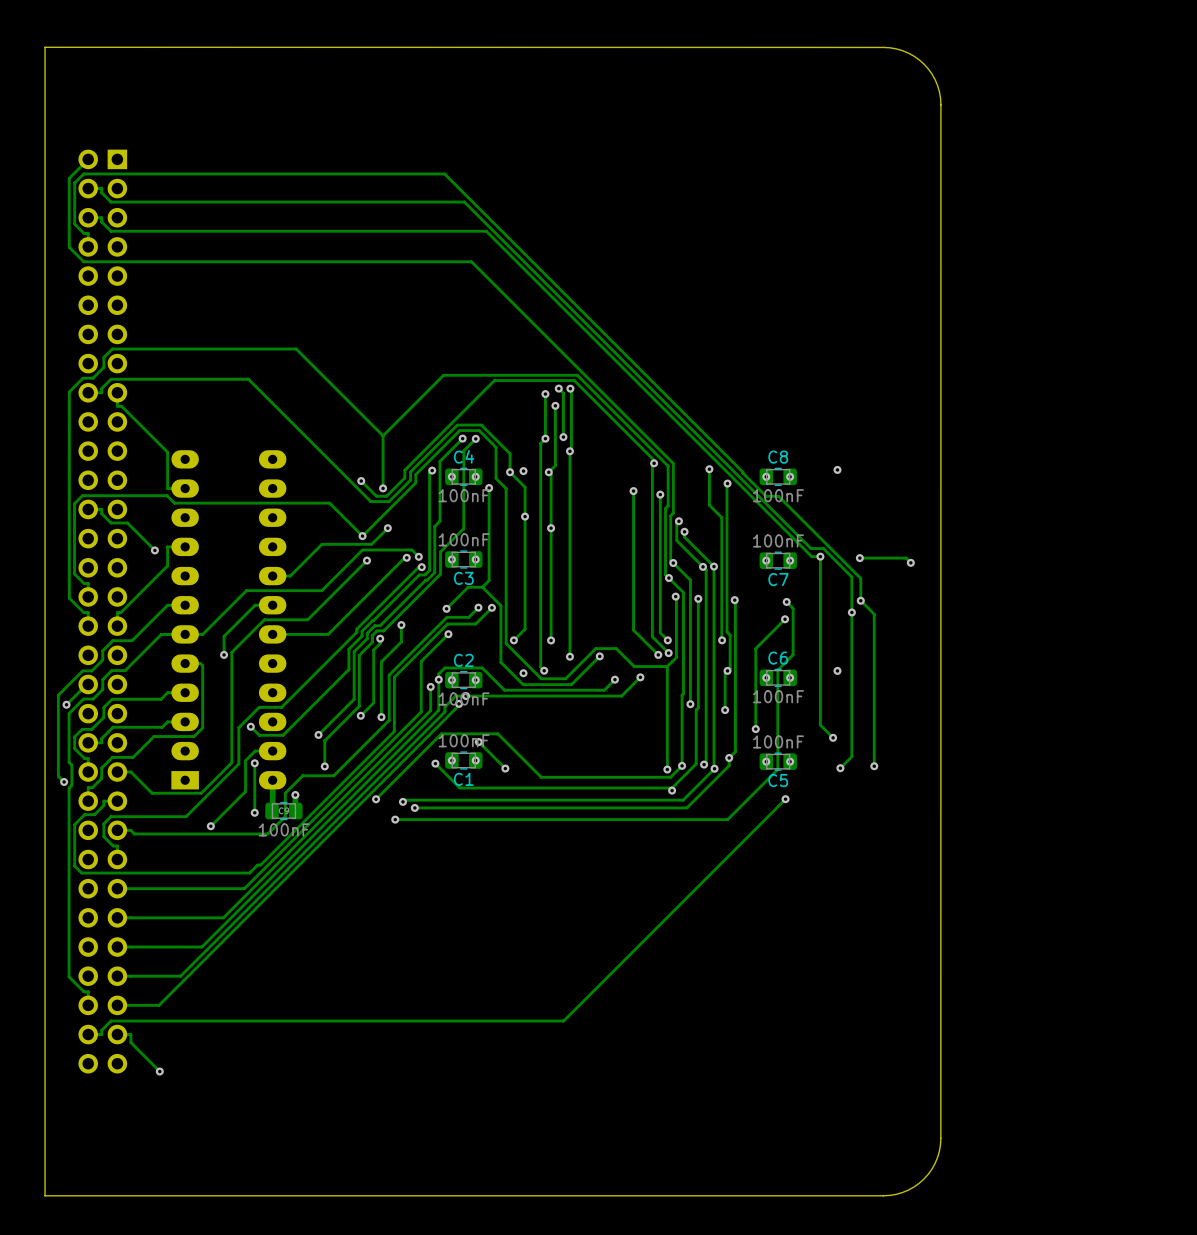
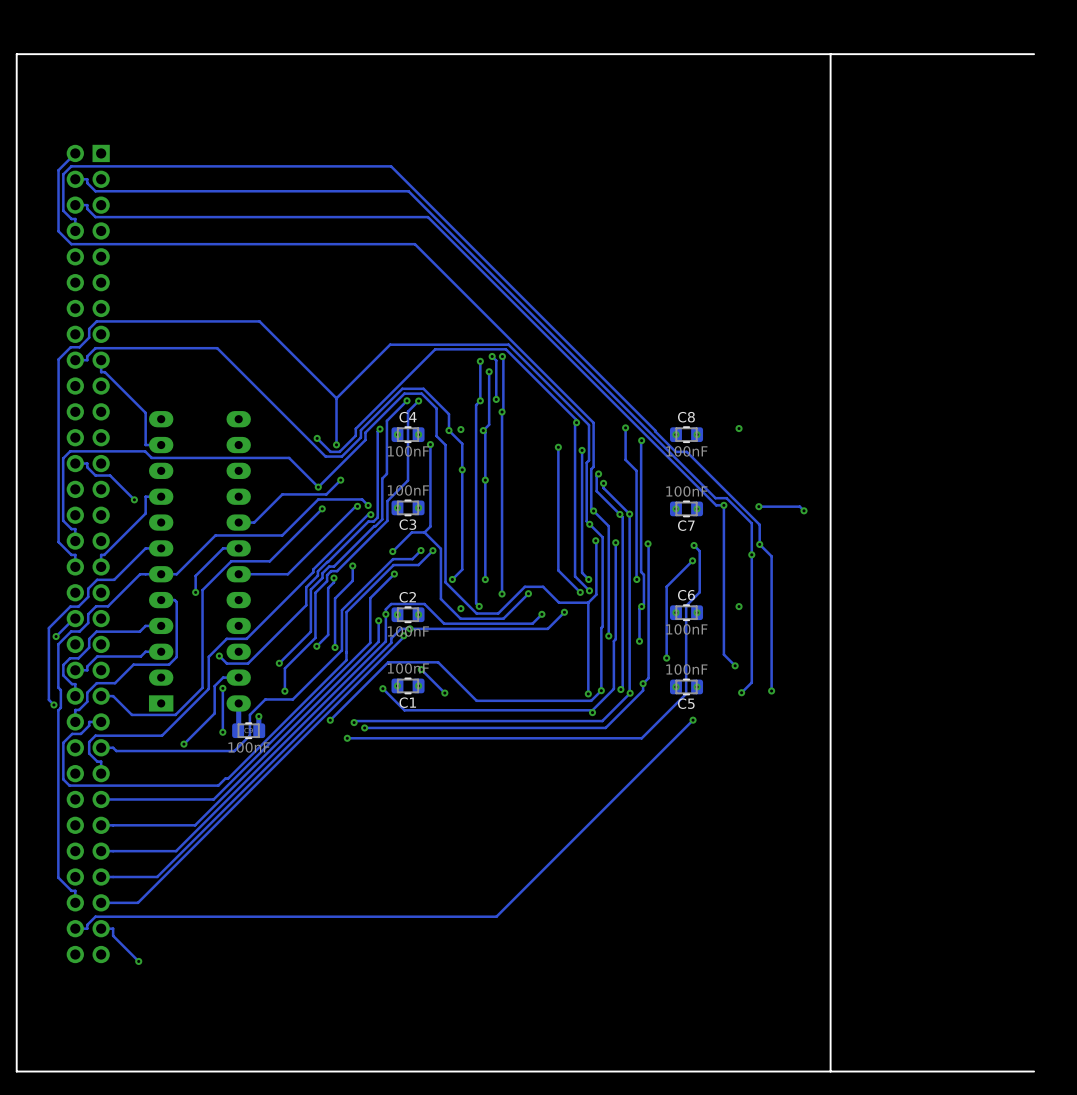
board edge: none -> (830, 54) (830, 1071)
board edge: none -> (1034, 54) (16, 54) (16, 1071) (37, 1071)
board edge: (883, 1195) (908, 1190) (924, 1178) (937, 1157) (940, 1138) (940, 104) (937, 85) (928, 69) (908, 53) (883, 47) (45, 47) (45, 1195) -> (779, 1071) (1034, 1071)

